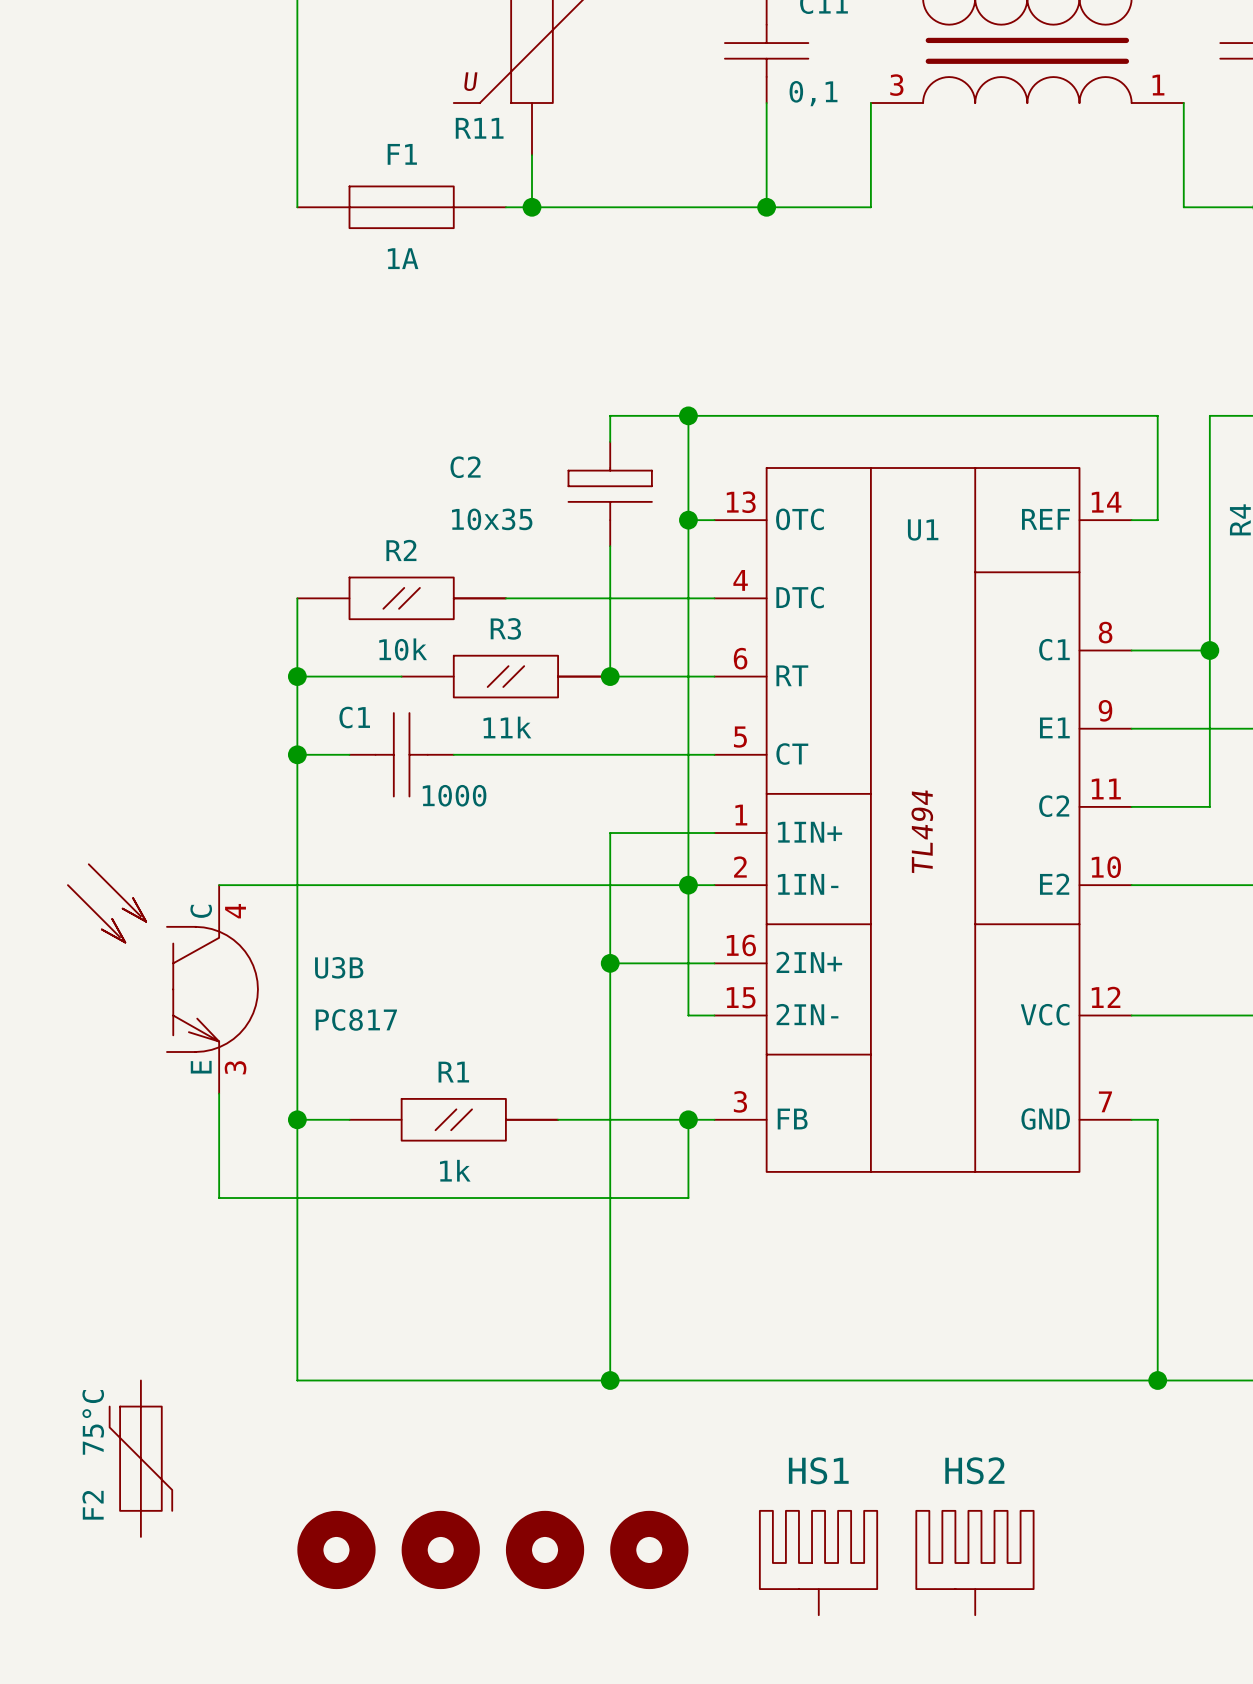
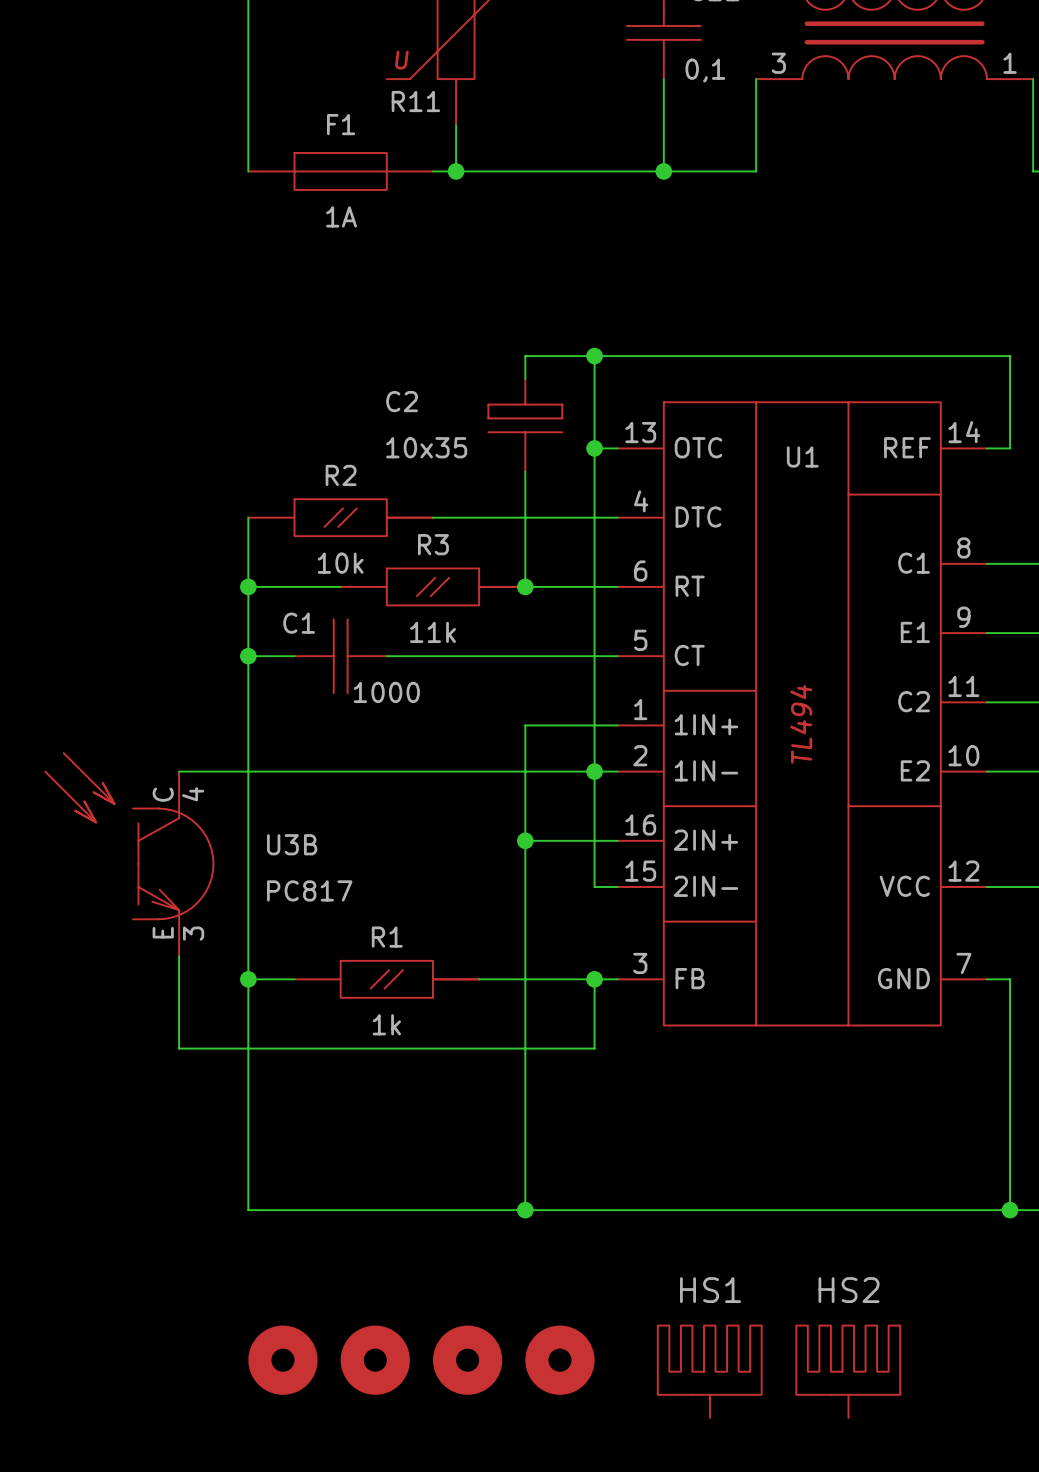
F2: 75°C (140, 1458) -> none

